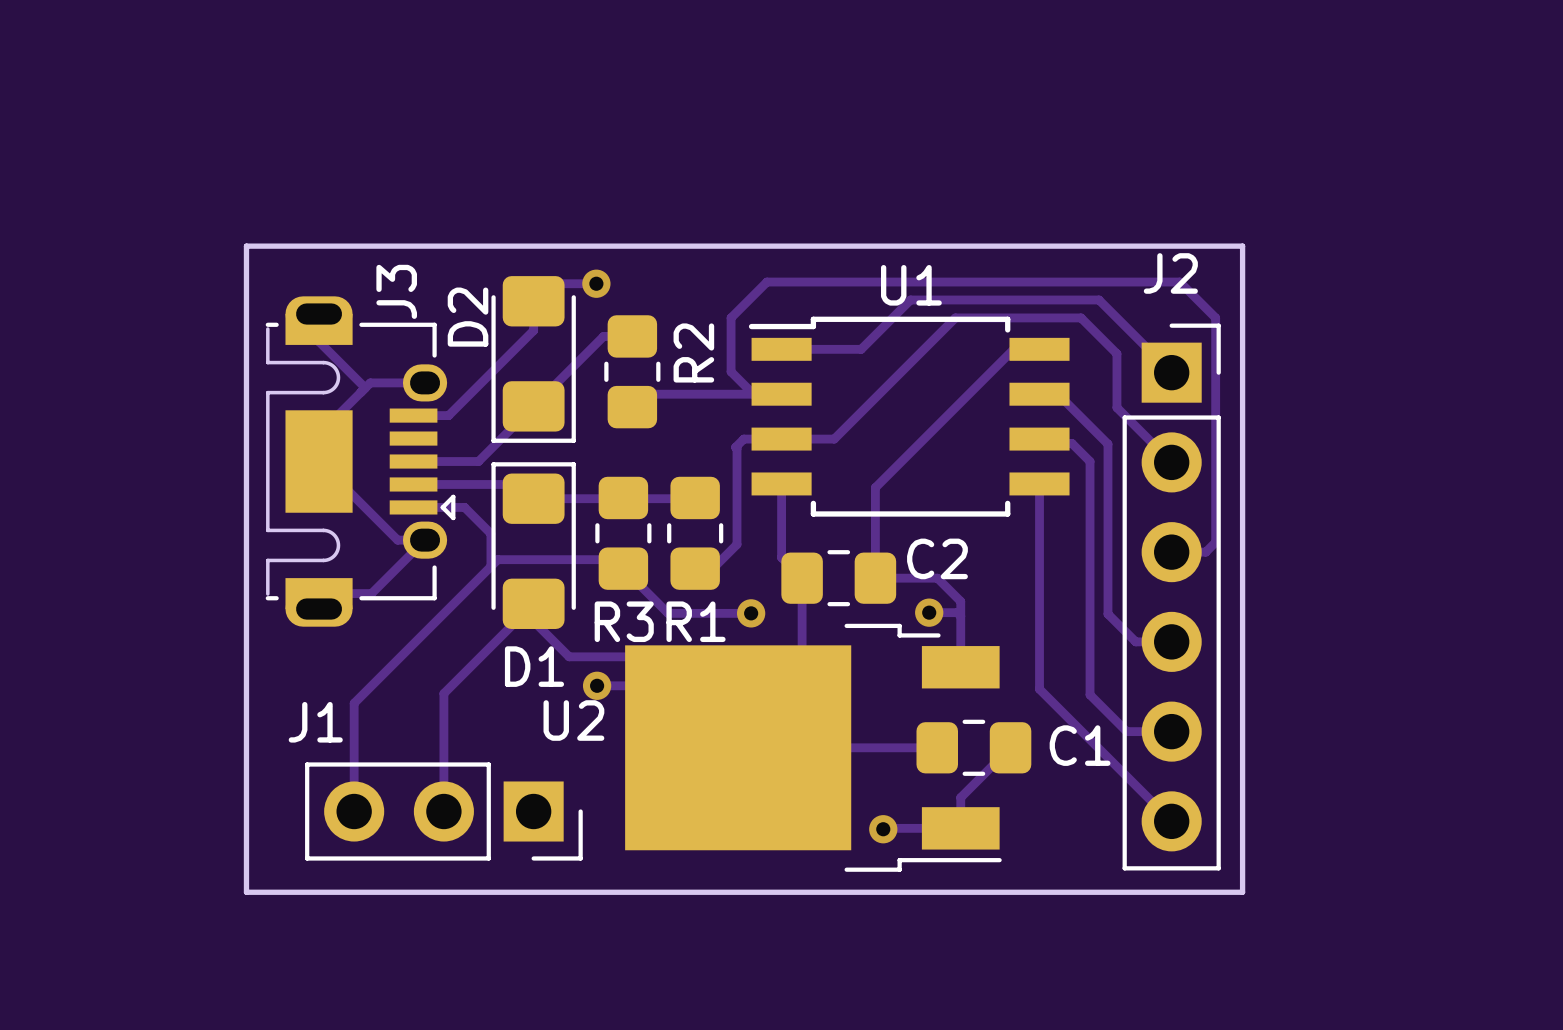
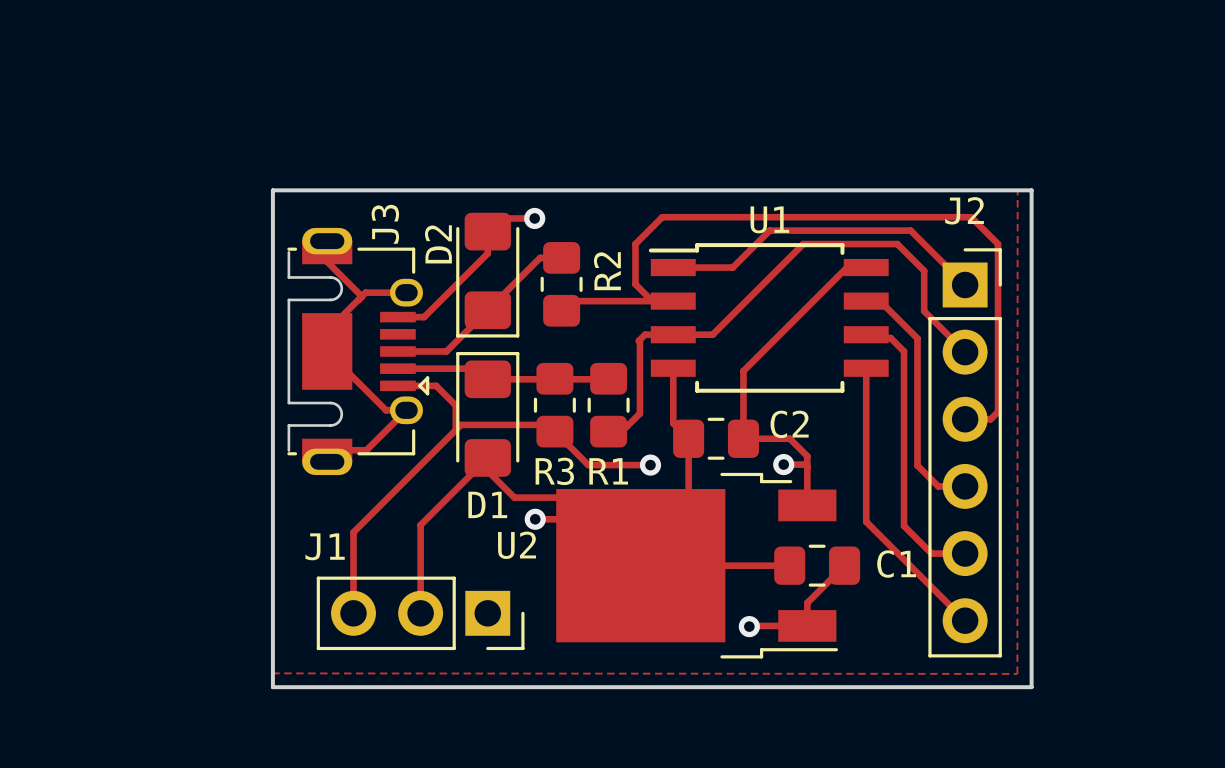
board edge: (1242, 246) (1242, 892) (246, 892) -> (1018, 190) (1031, 190) (1031, 687) (272, 687) (272, 673)

